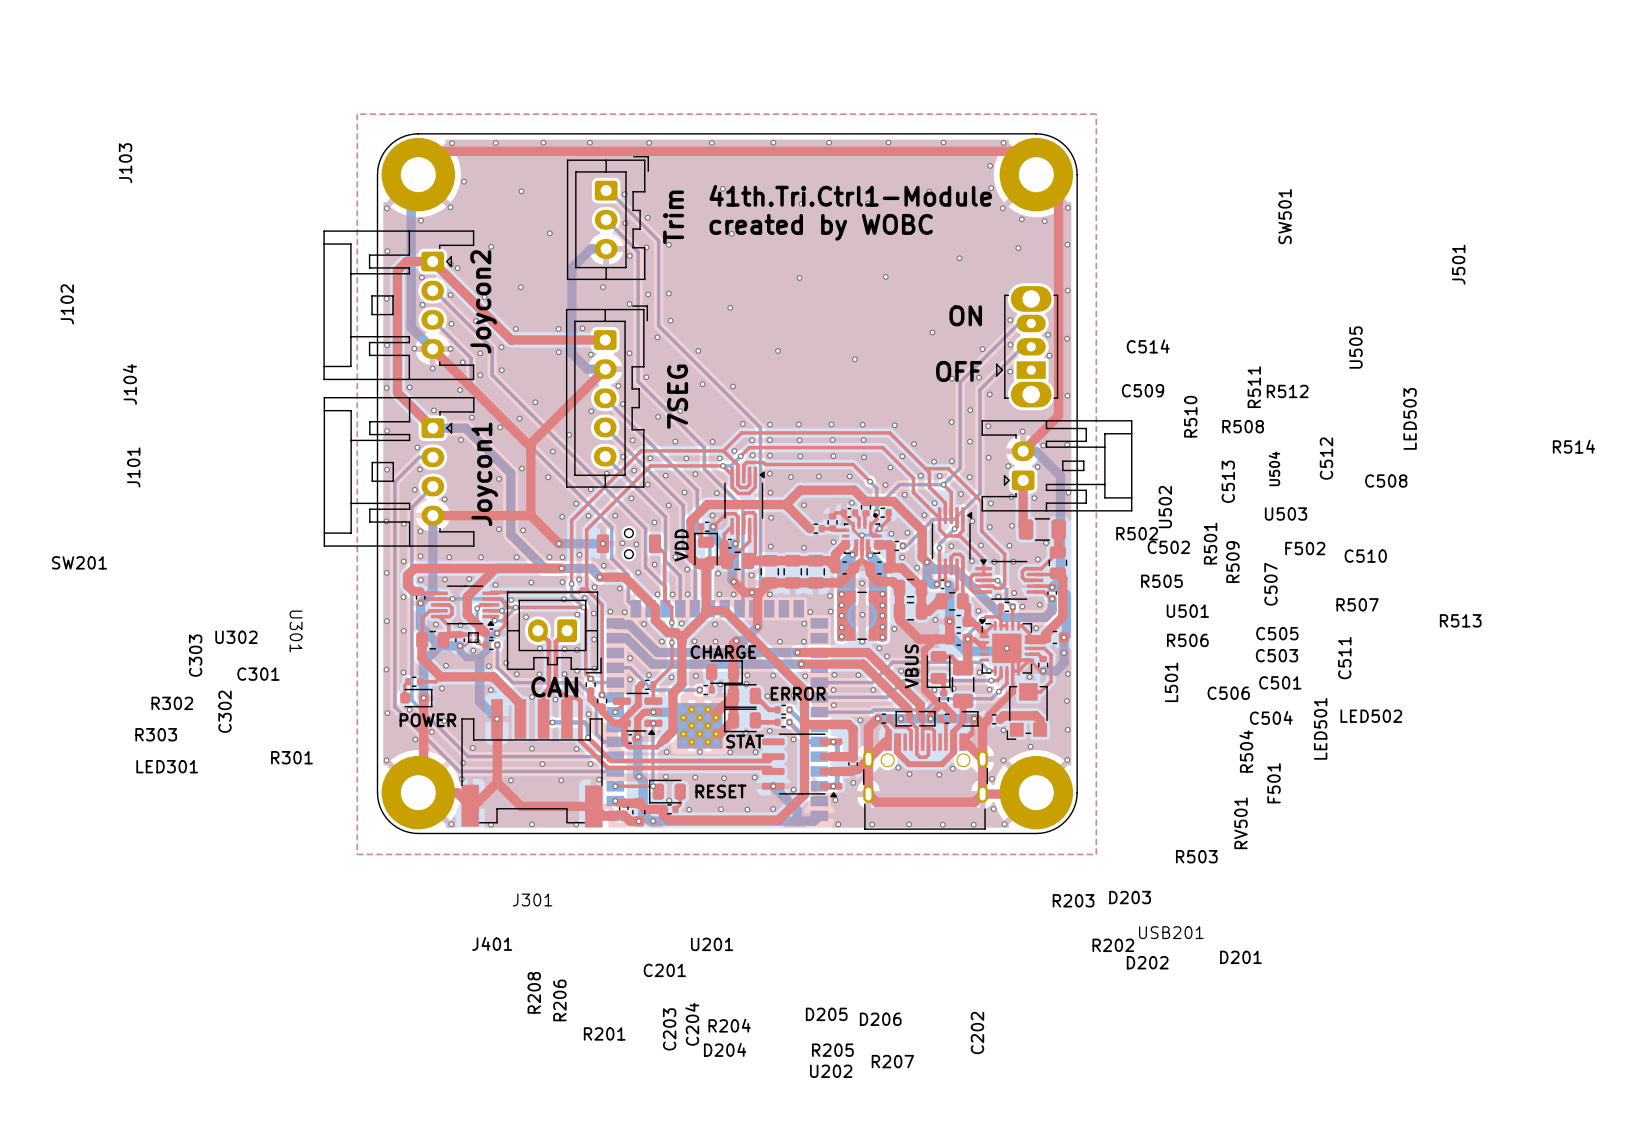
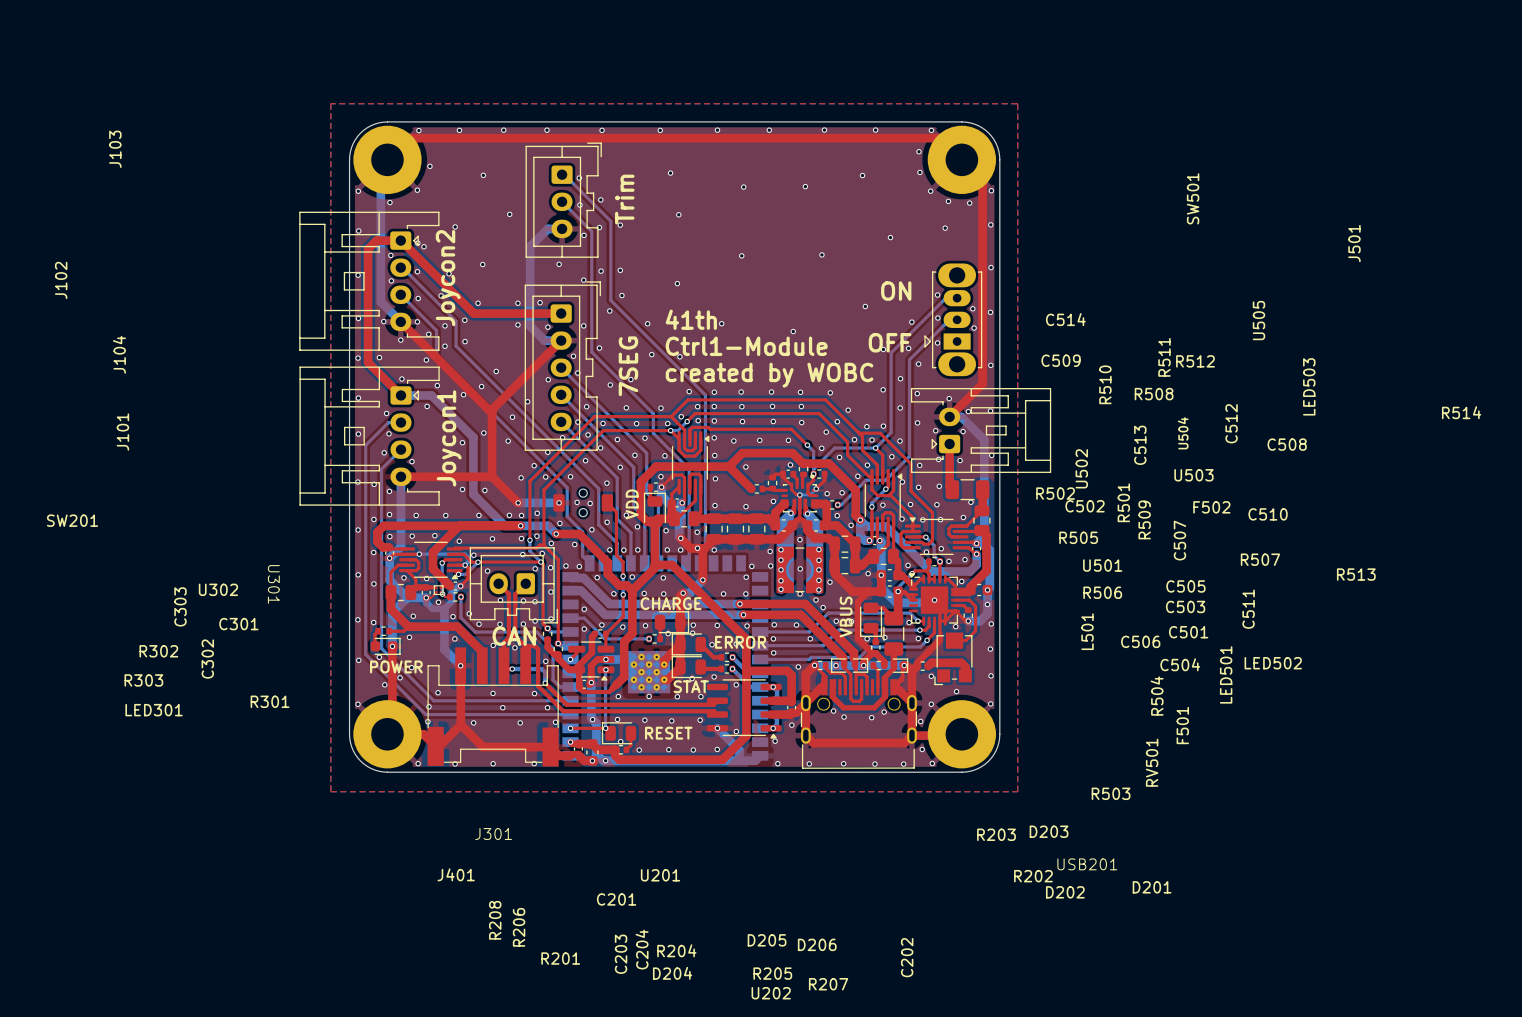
text: 41th.Tri.Ctrl1-Module (850, 195) -> none
text position: created by WOBC (821, 227) -> created by WOBC (769, 375)
text: none -> 41th (691, 319)
text: none -> Ctrl1-Module (746, 346)

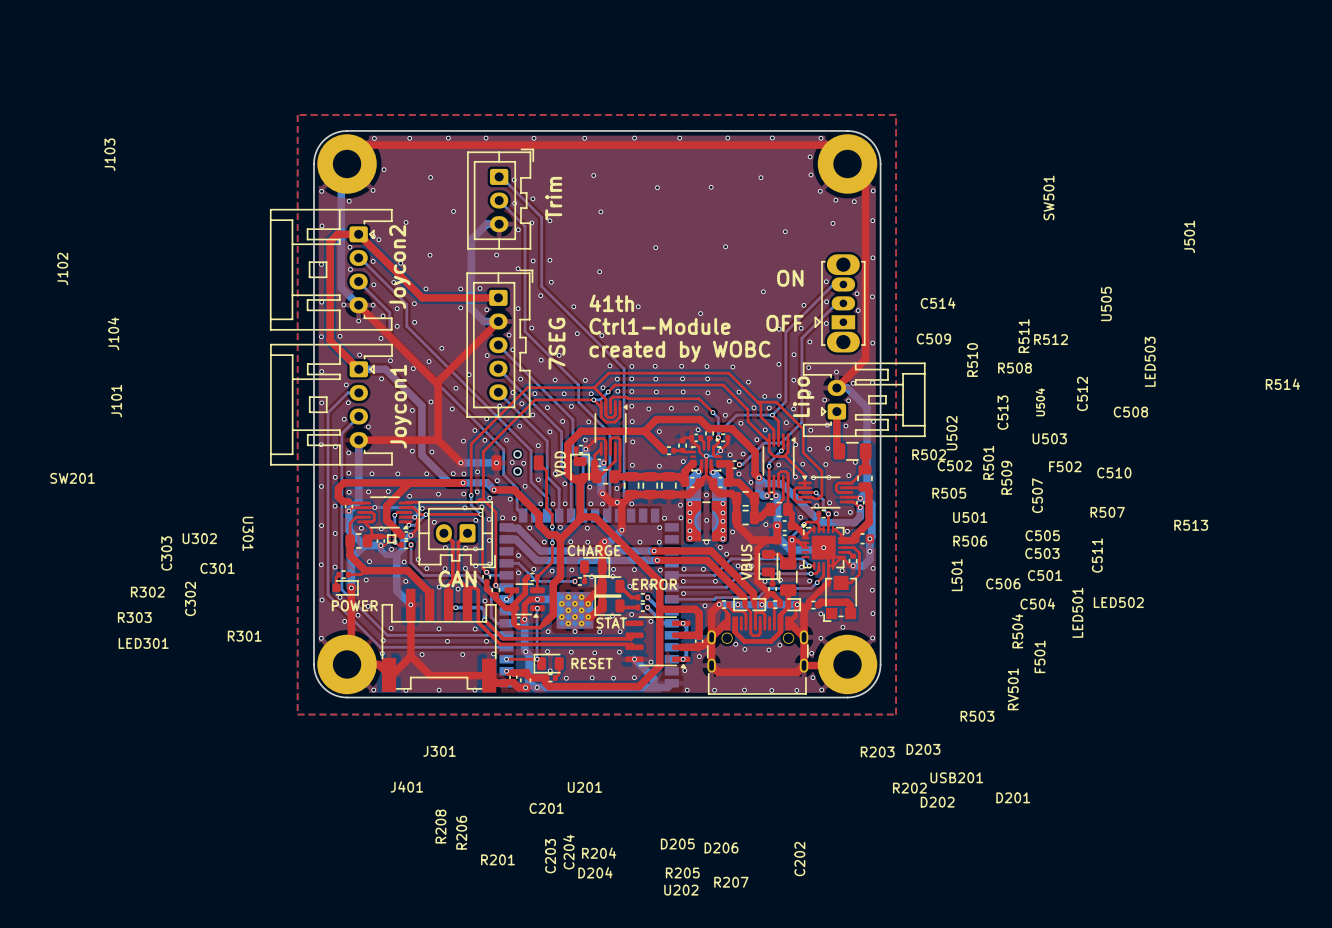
text: none -> Lipo (803, 396)

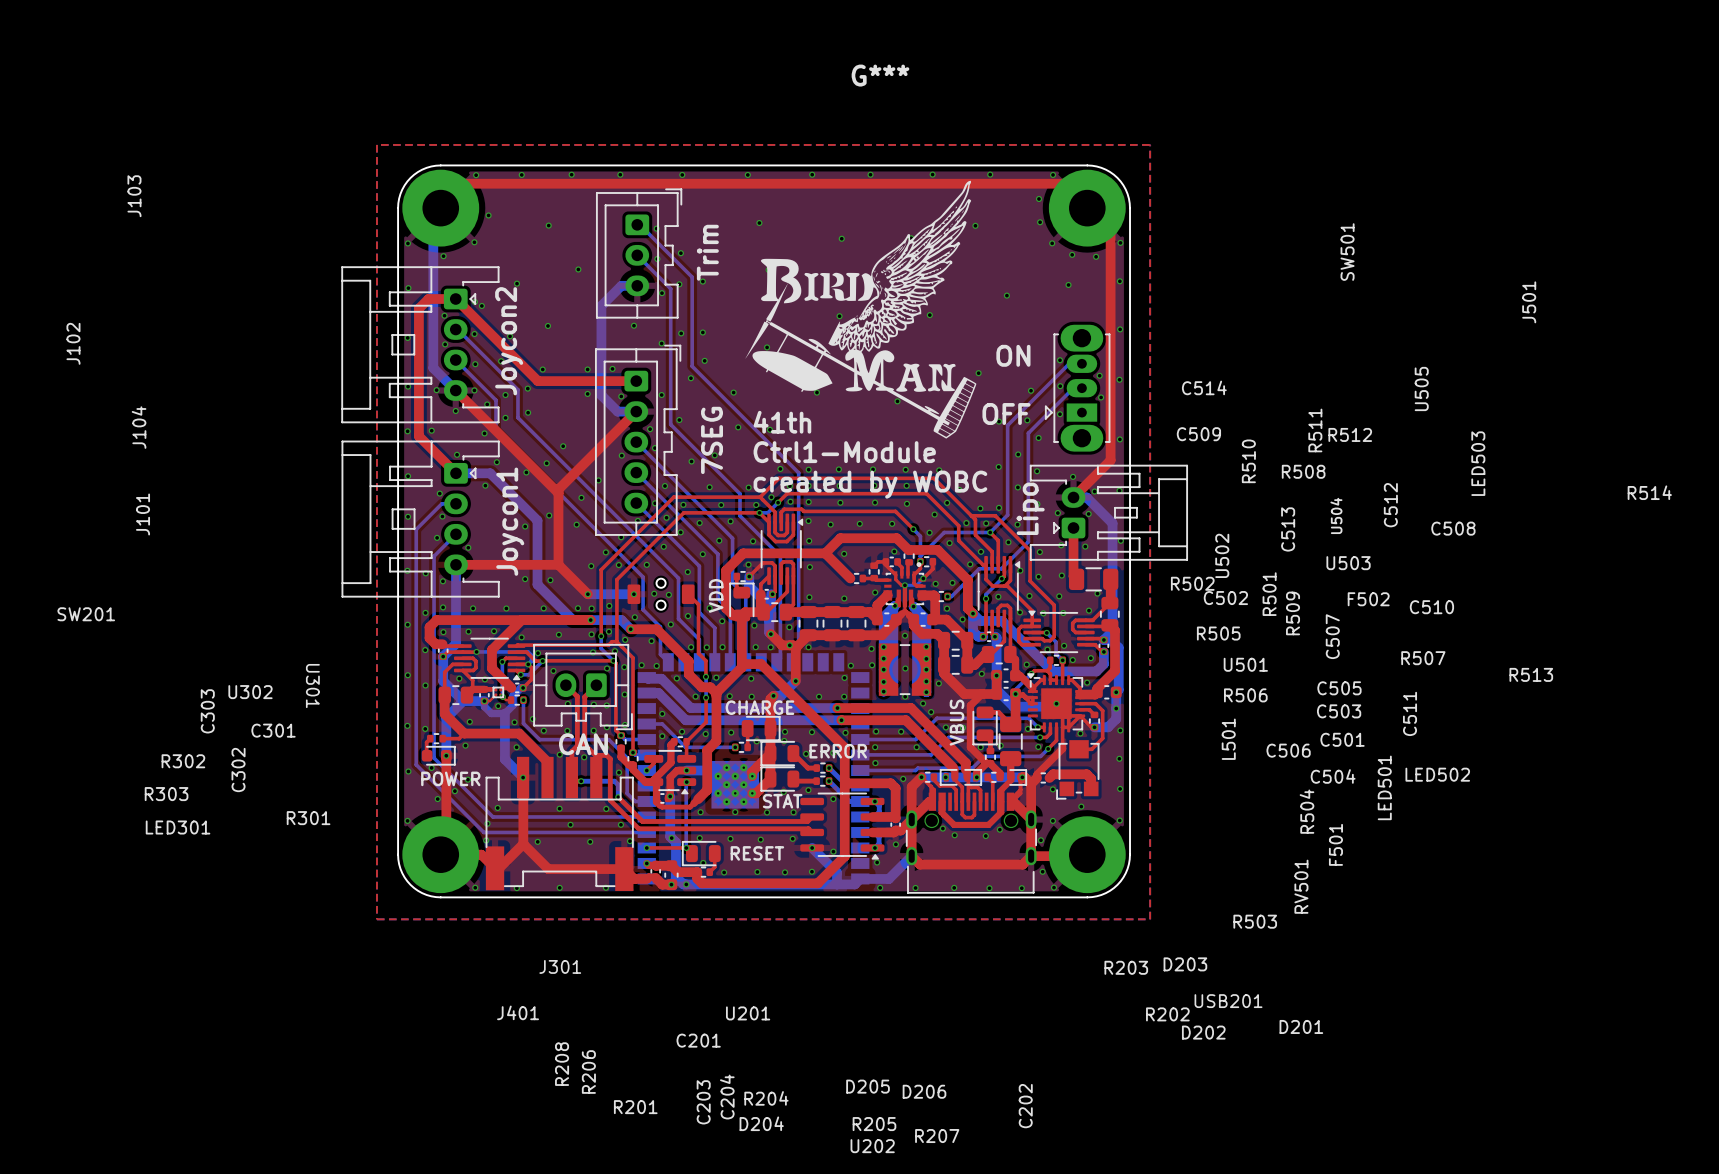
G***: none -> (860, 309)
text: 41th (611, 303) -> none
text: Ctrl1-Module (660, 326) -> 41th (782, 422)
text: created by WOBC (679, 351) -> Ctrl1-Module (844, 452)
text: none -> created by WOBC (870, 484)
bottom track: none -> (911, 856) (888, 878) (860, 878)

